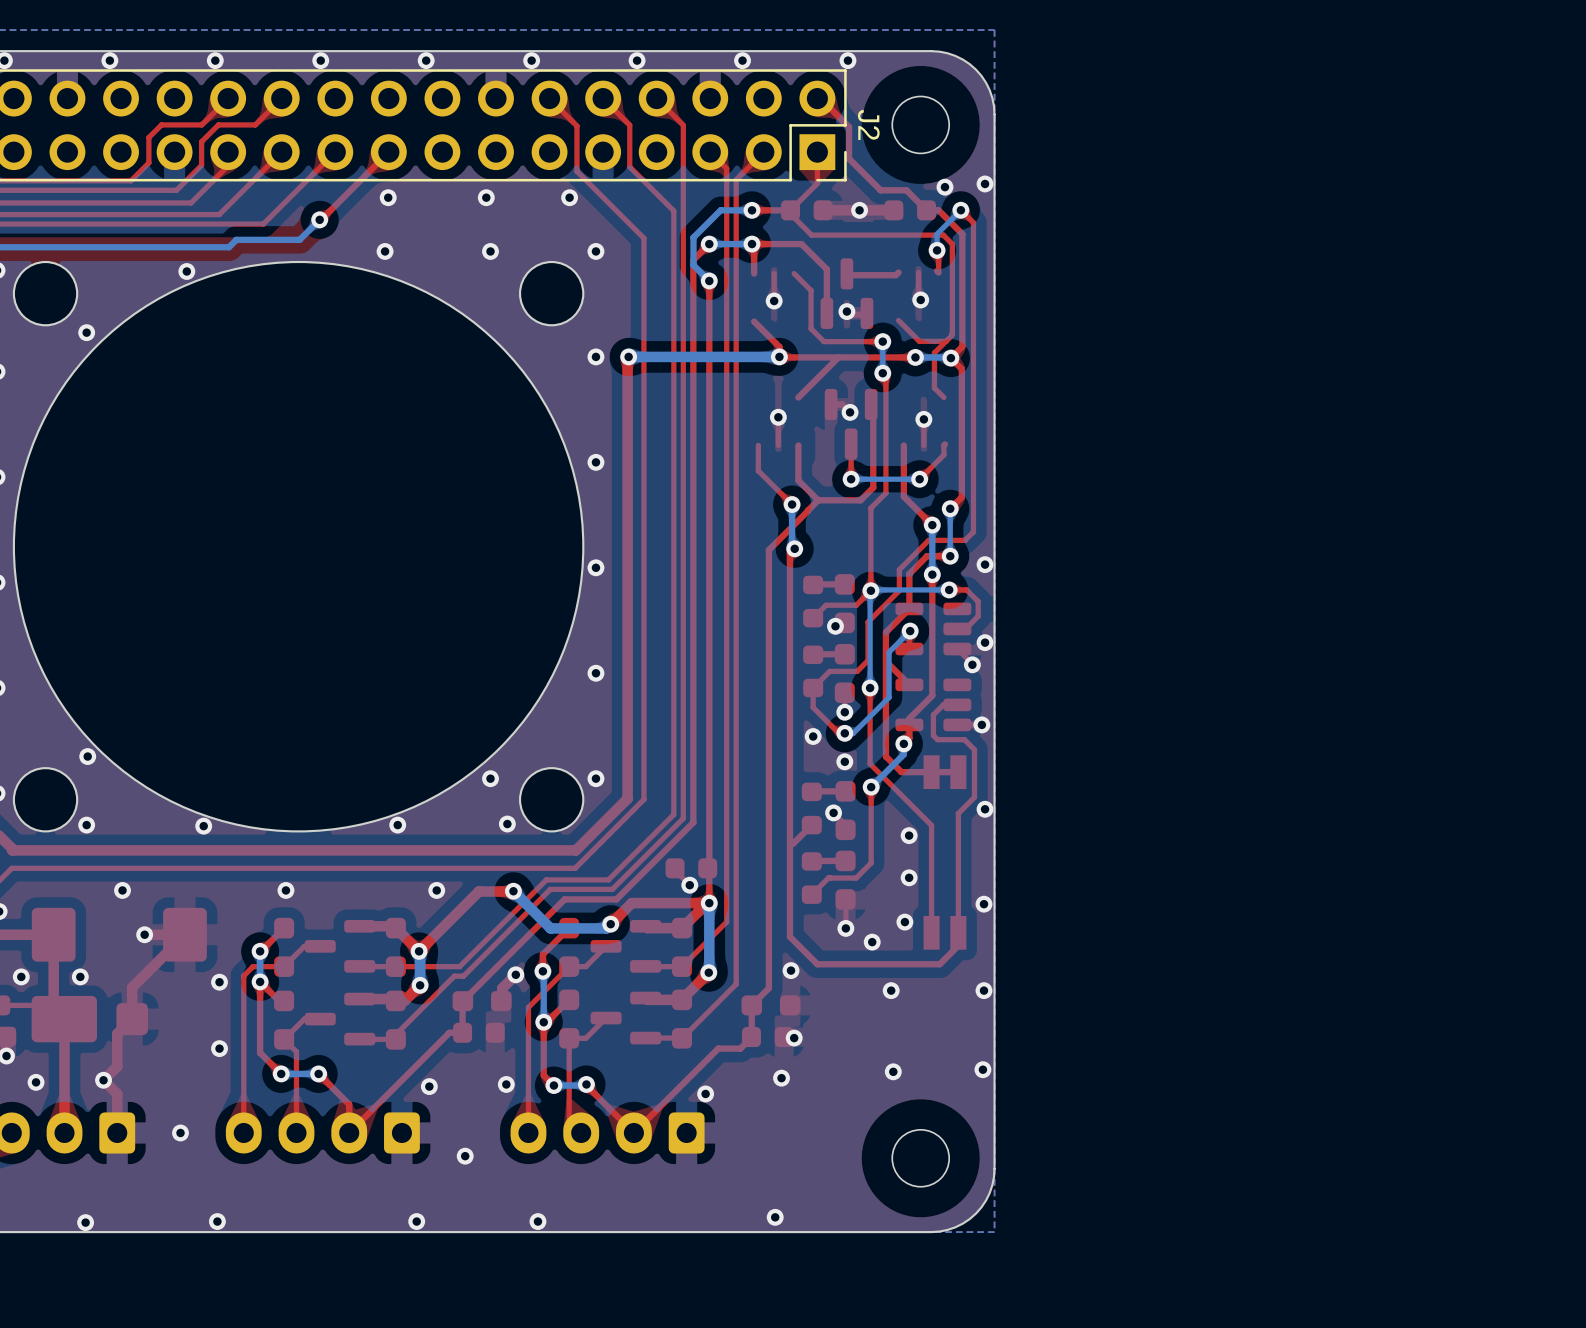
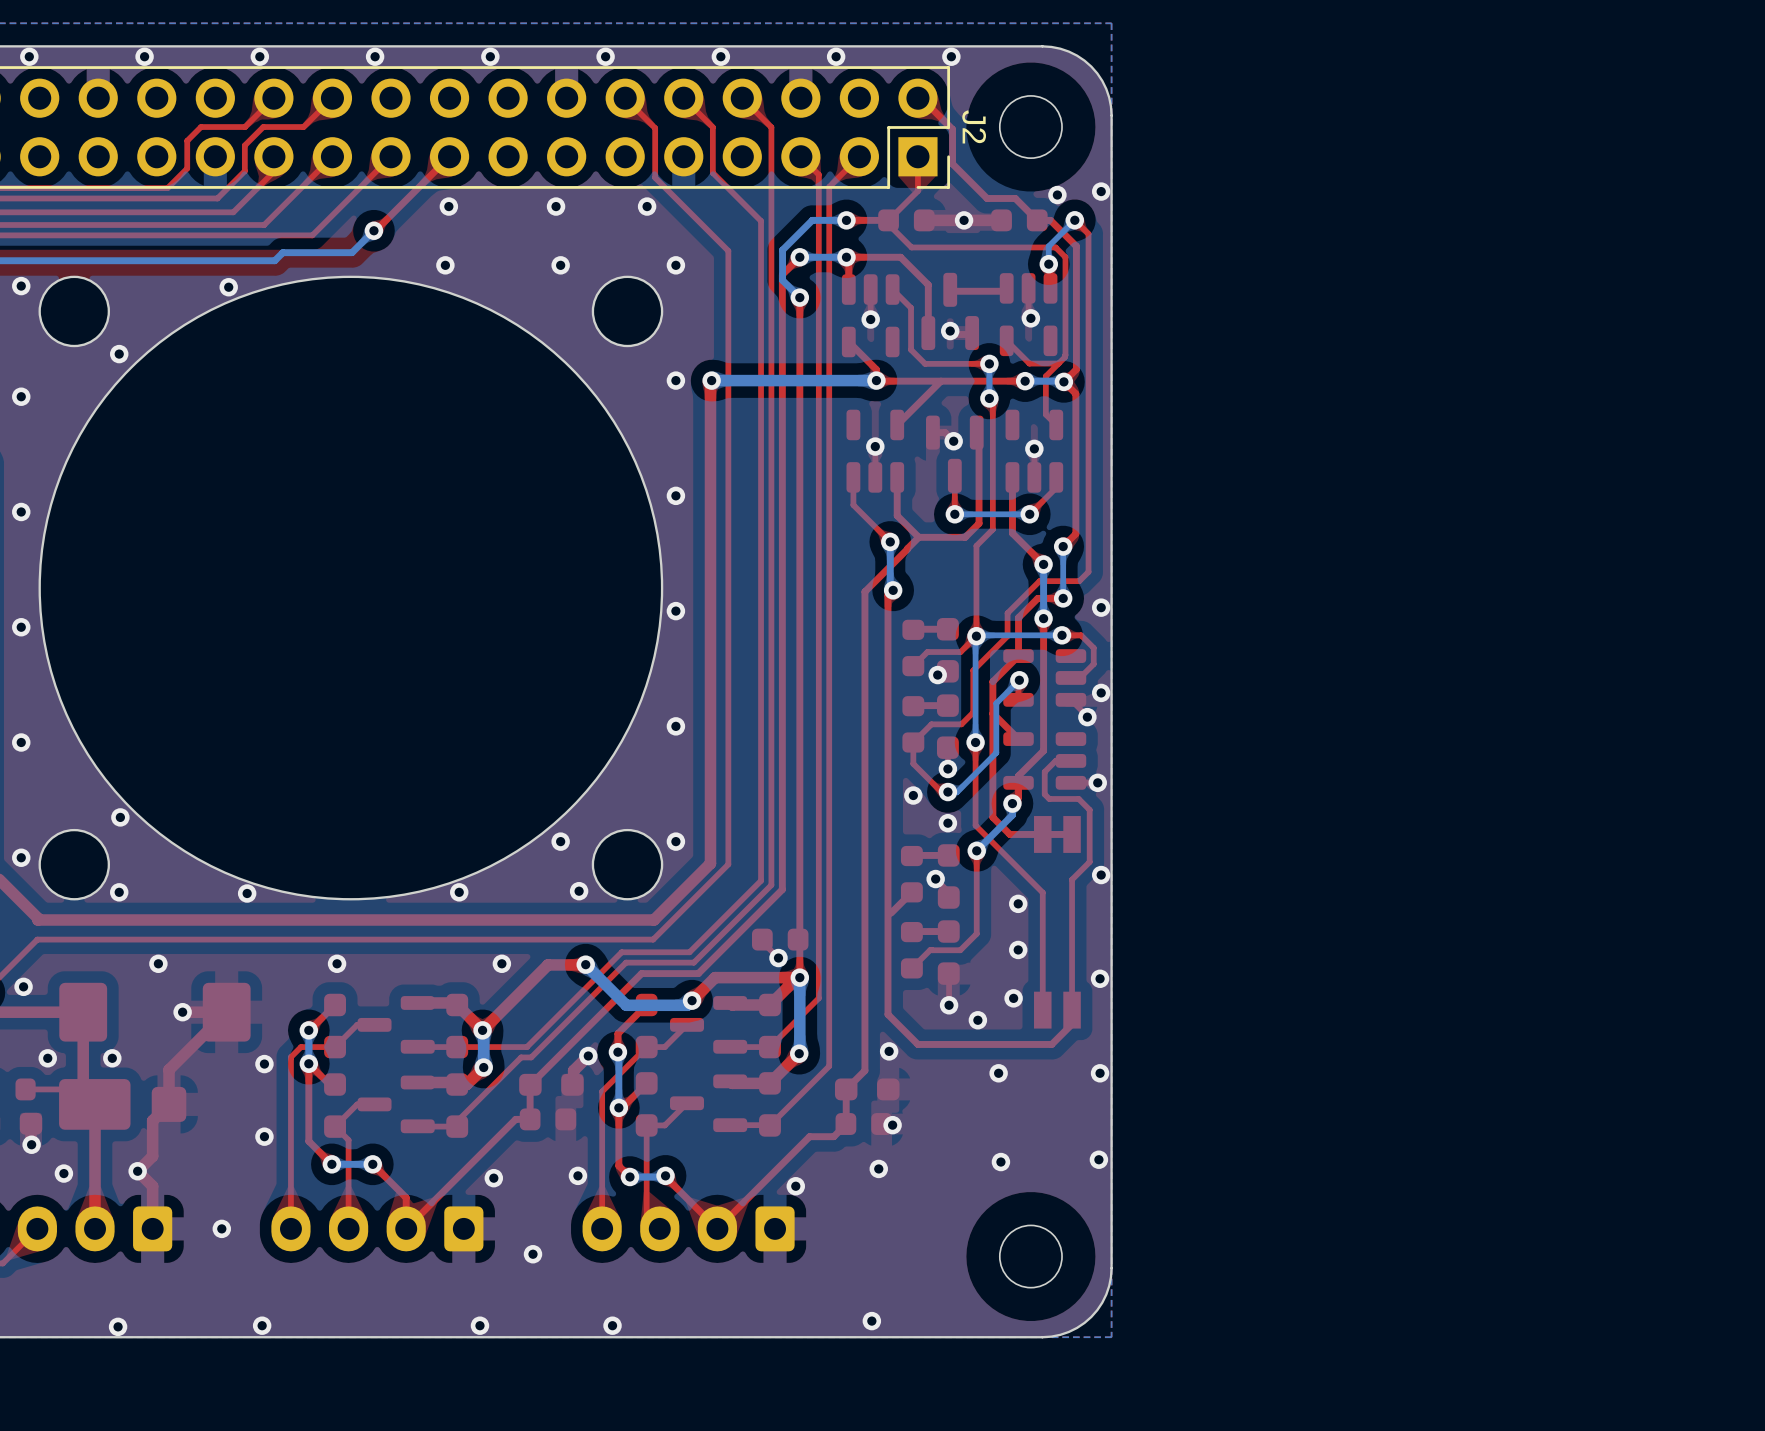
part: none -> (1028, 314)
part: none -> (870, 315)
part: none -> (875, 451)
part: none -> (1034, 451)

